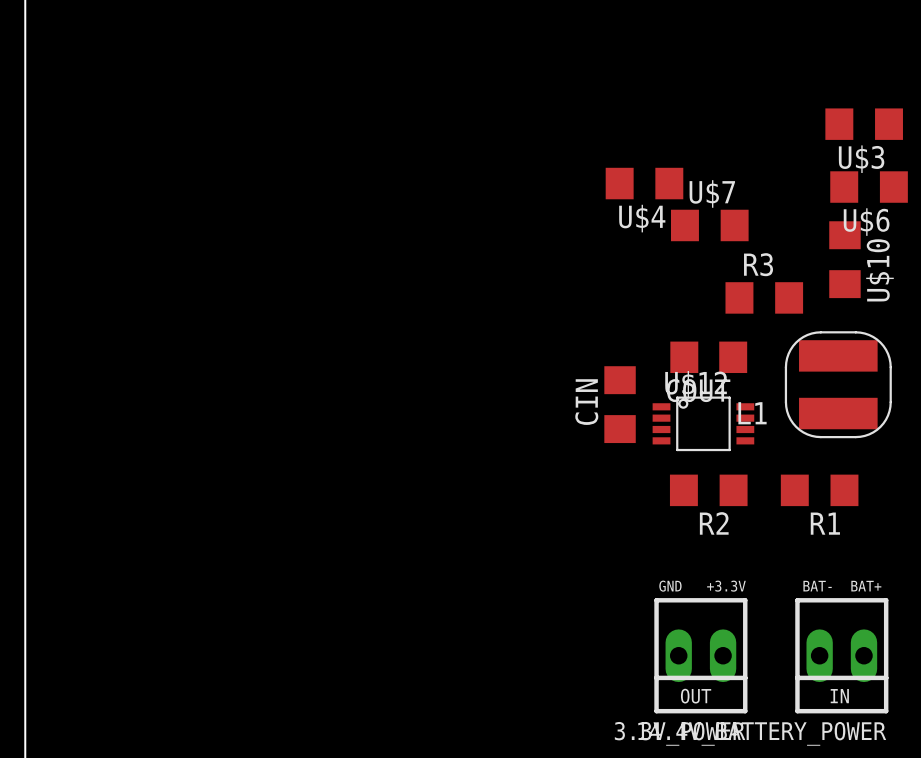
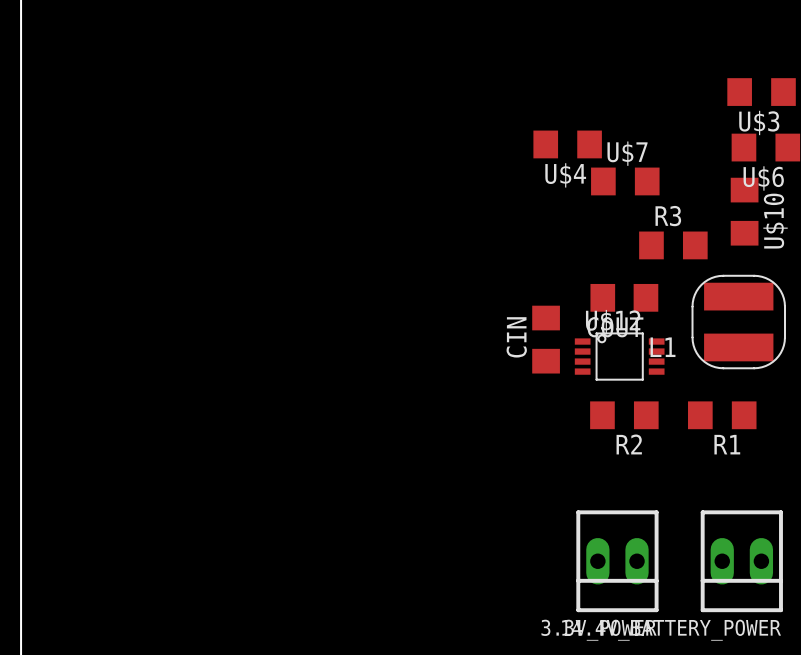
text: GND (670, 586) -> none
text: +3.3V (726, 586) -> none
text: BAT- (817, 586) -> none
text: BAT+ (866, 586) -> none
text: OUT (696, 696) -> none
text: IN (839, 696) -> none

